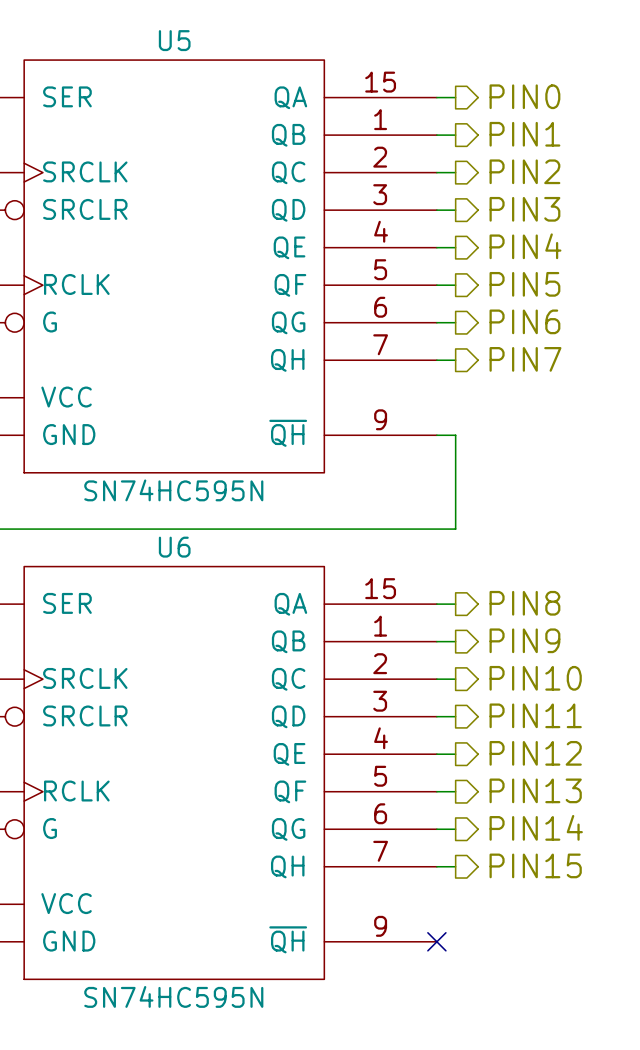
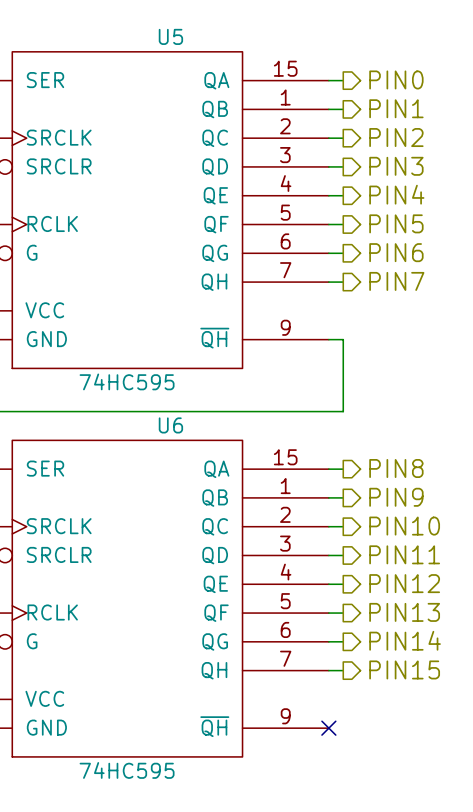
U5 name position: U5 (174, 40) -> U5 (170, 36)
U5 value: SN74HC595N (173, 490) -> 74HC595 (127, 381)
U6 name position: U6 (174, 547) -> U6 (170, 425)
U6 value: SN74HC595N (173, 996) -> 74HC595 (127, 770)

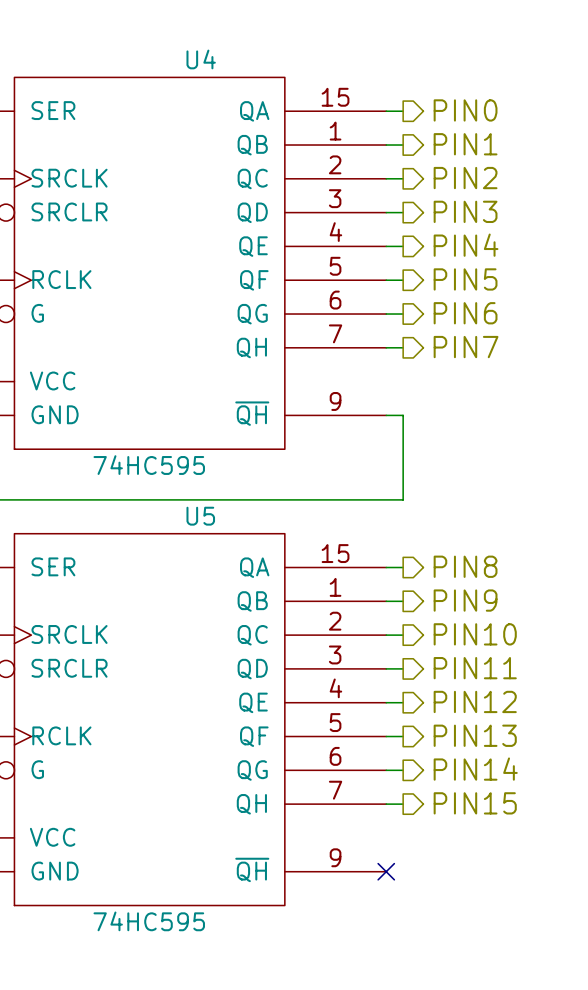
U5 name: U5 (170, 36) -> U4 (201, 59)
U6 name: U6 (170, 425) -> U5 (200, 516)

